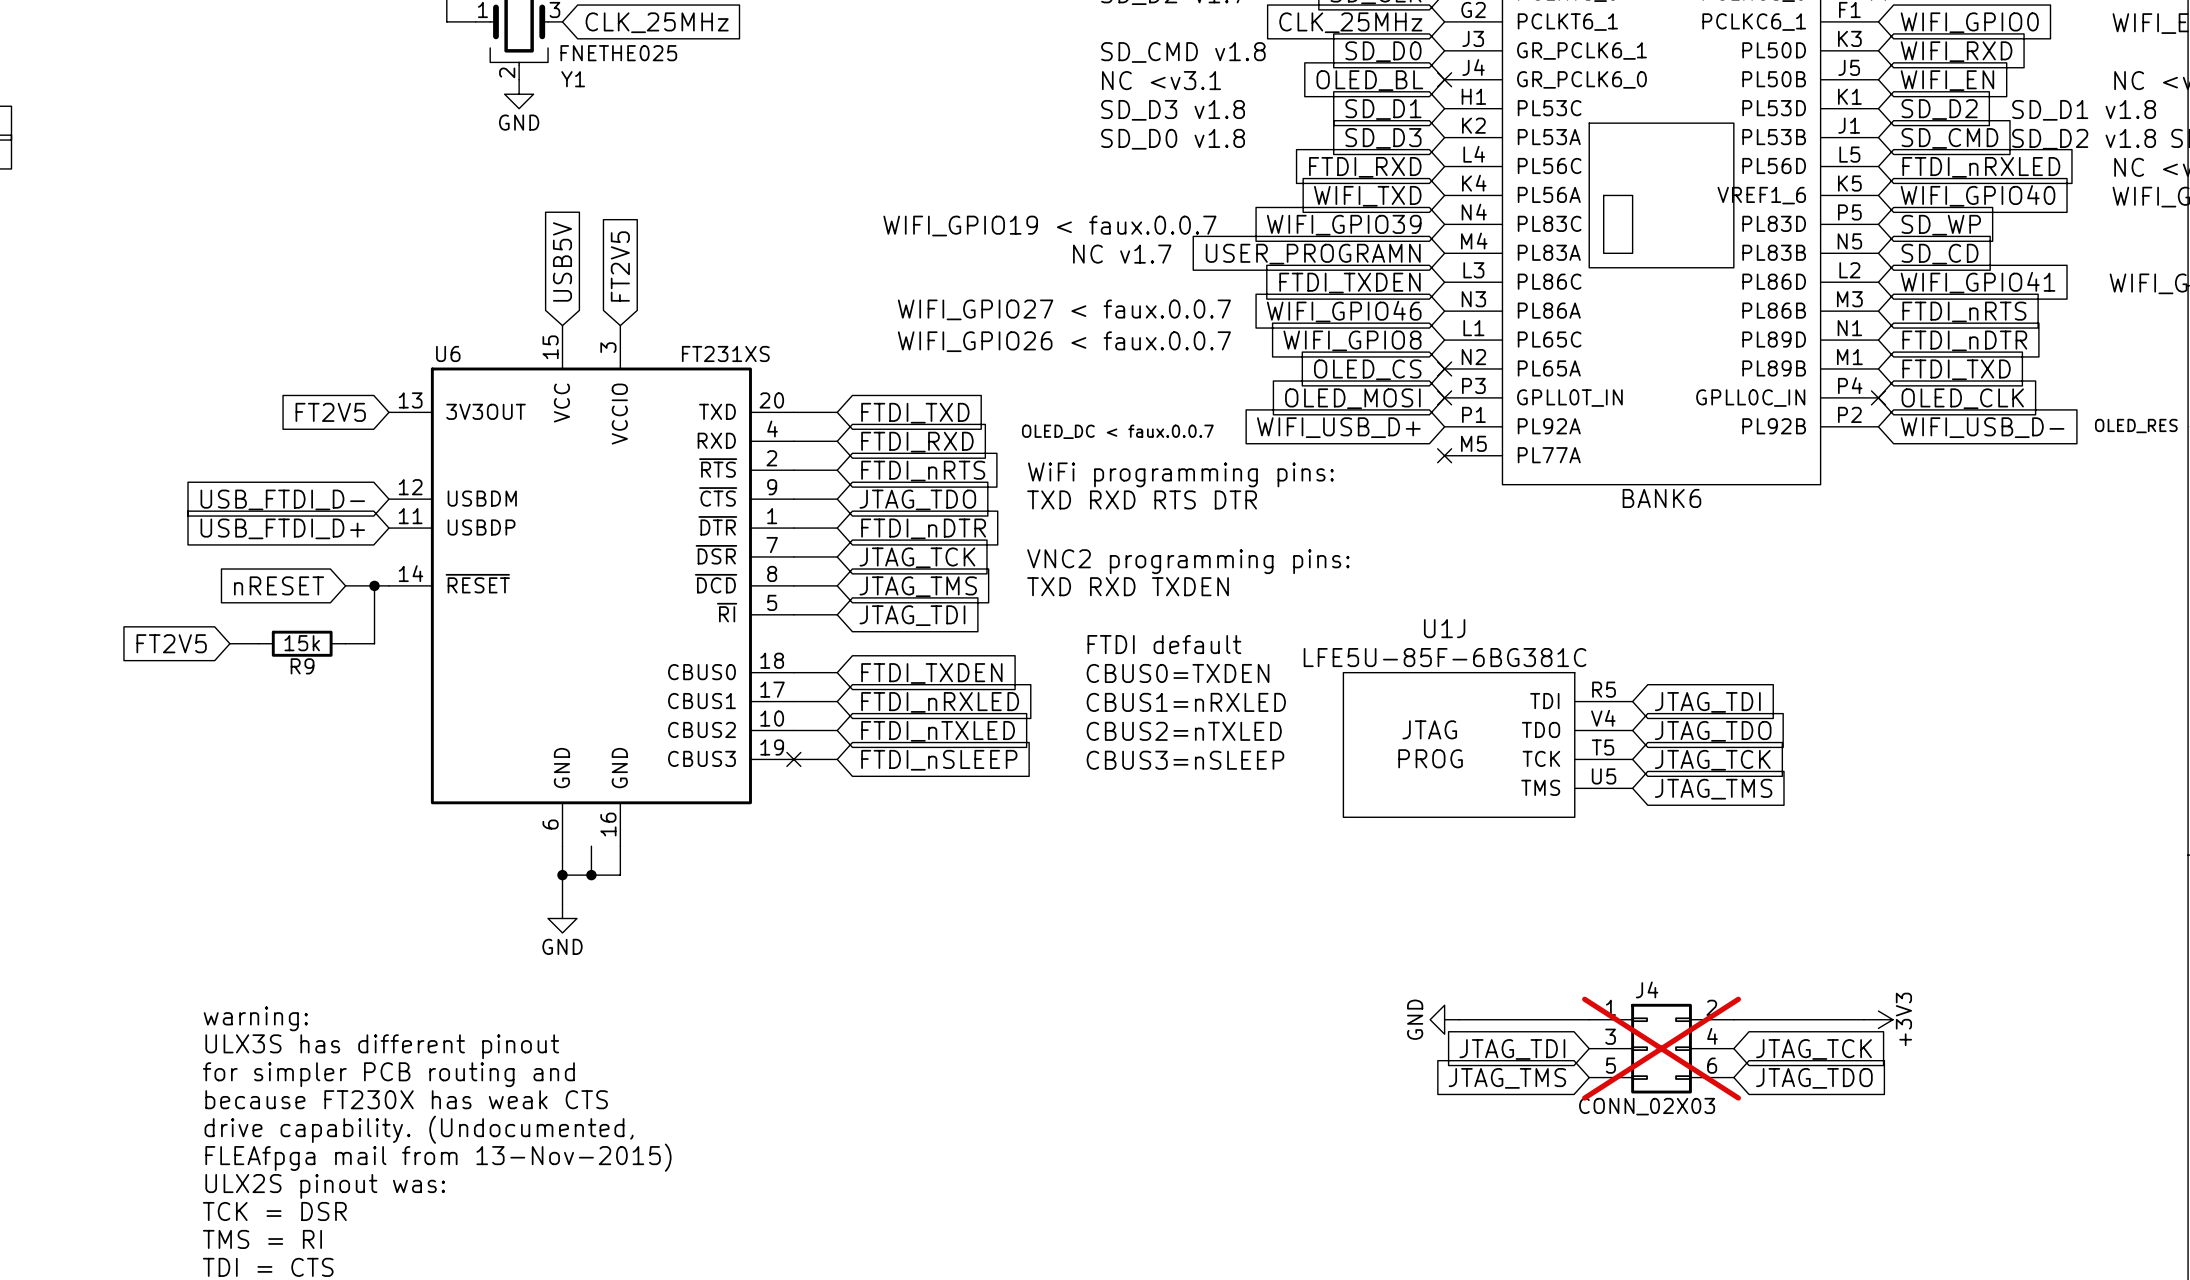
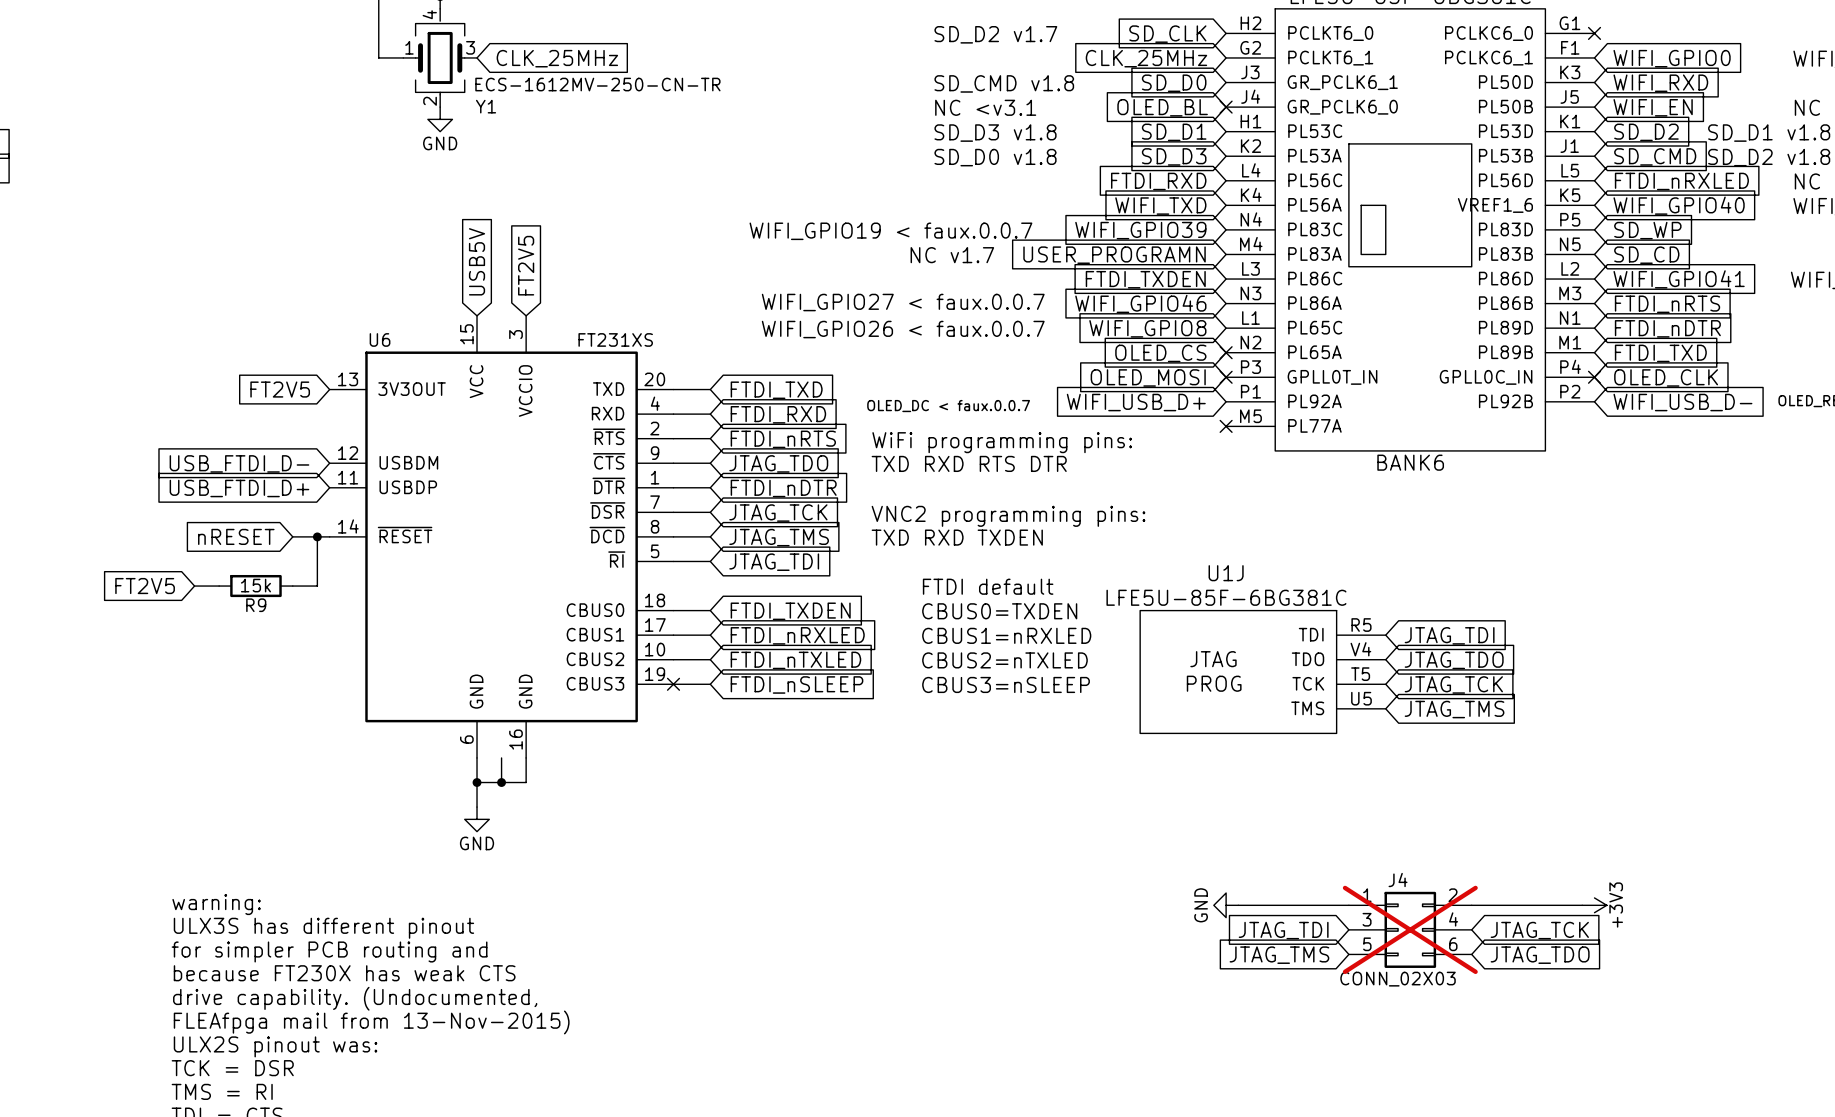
Y1 value: FNETHE025 (618, 53) -> ECS-1612MV-250-CN-TR (597, 84)

